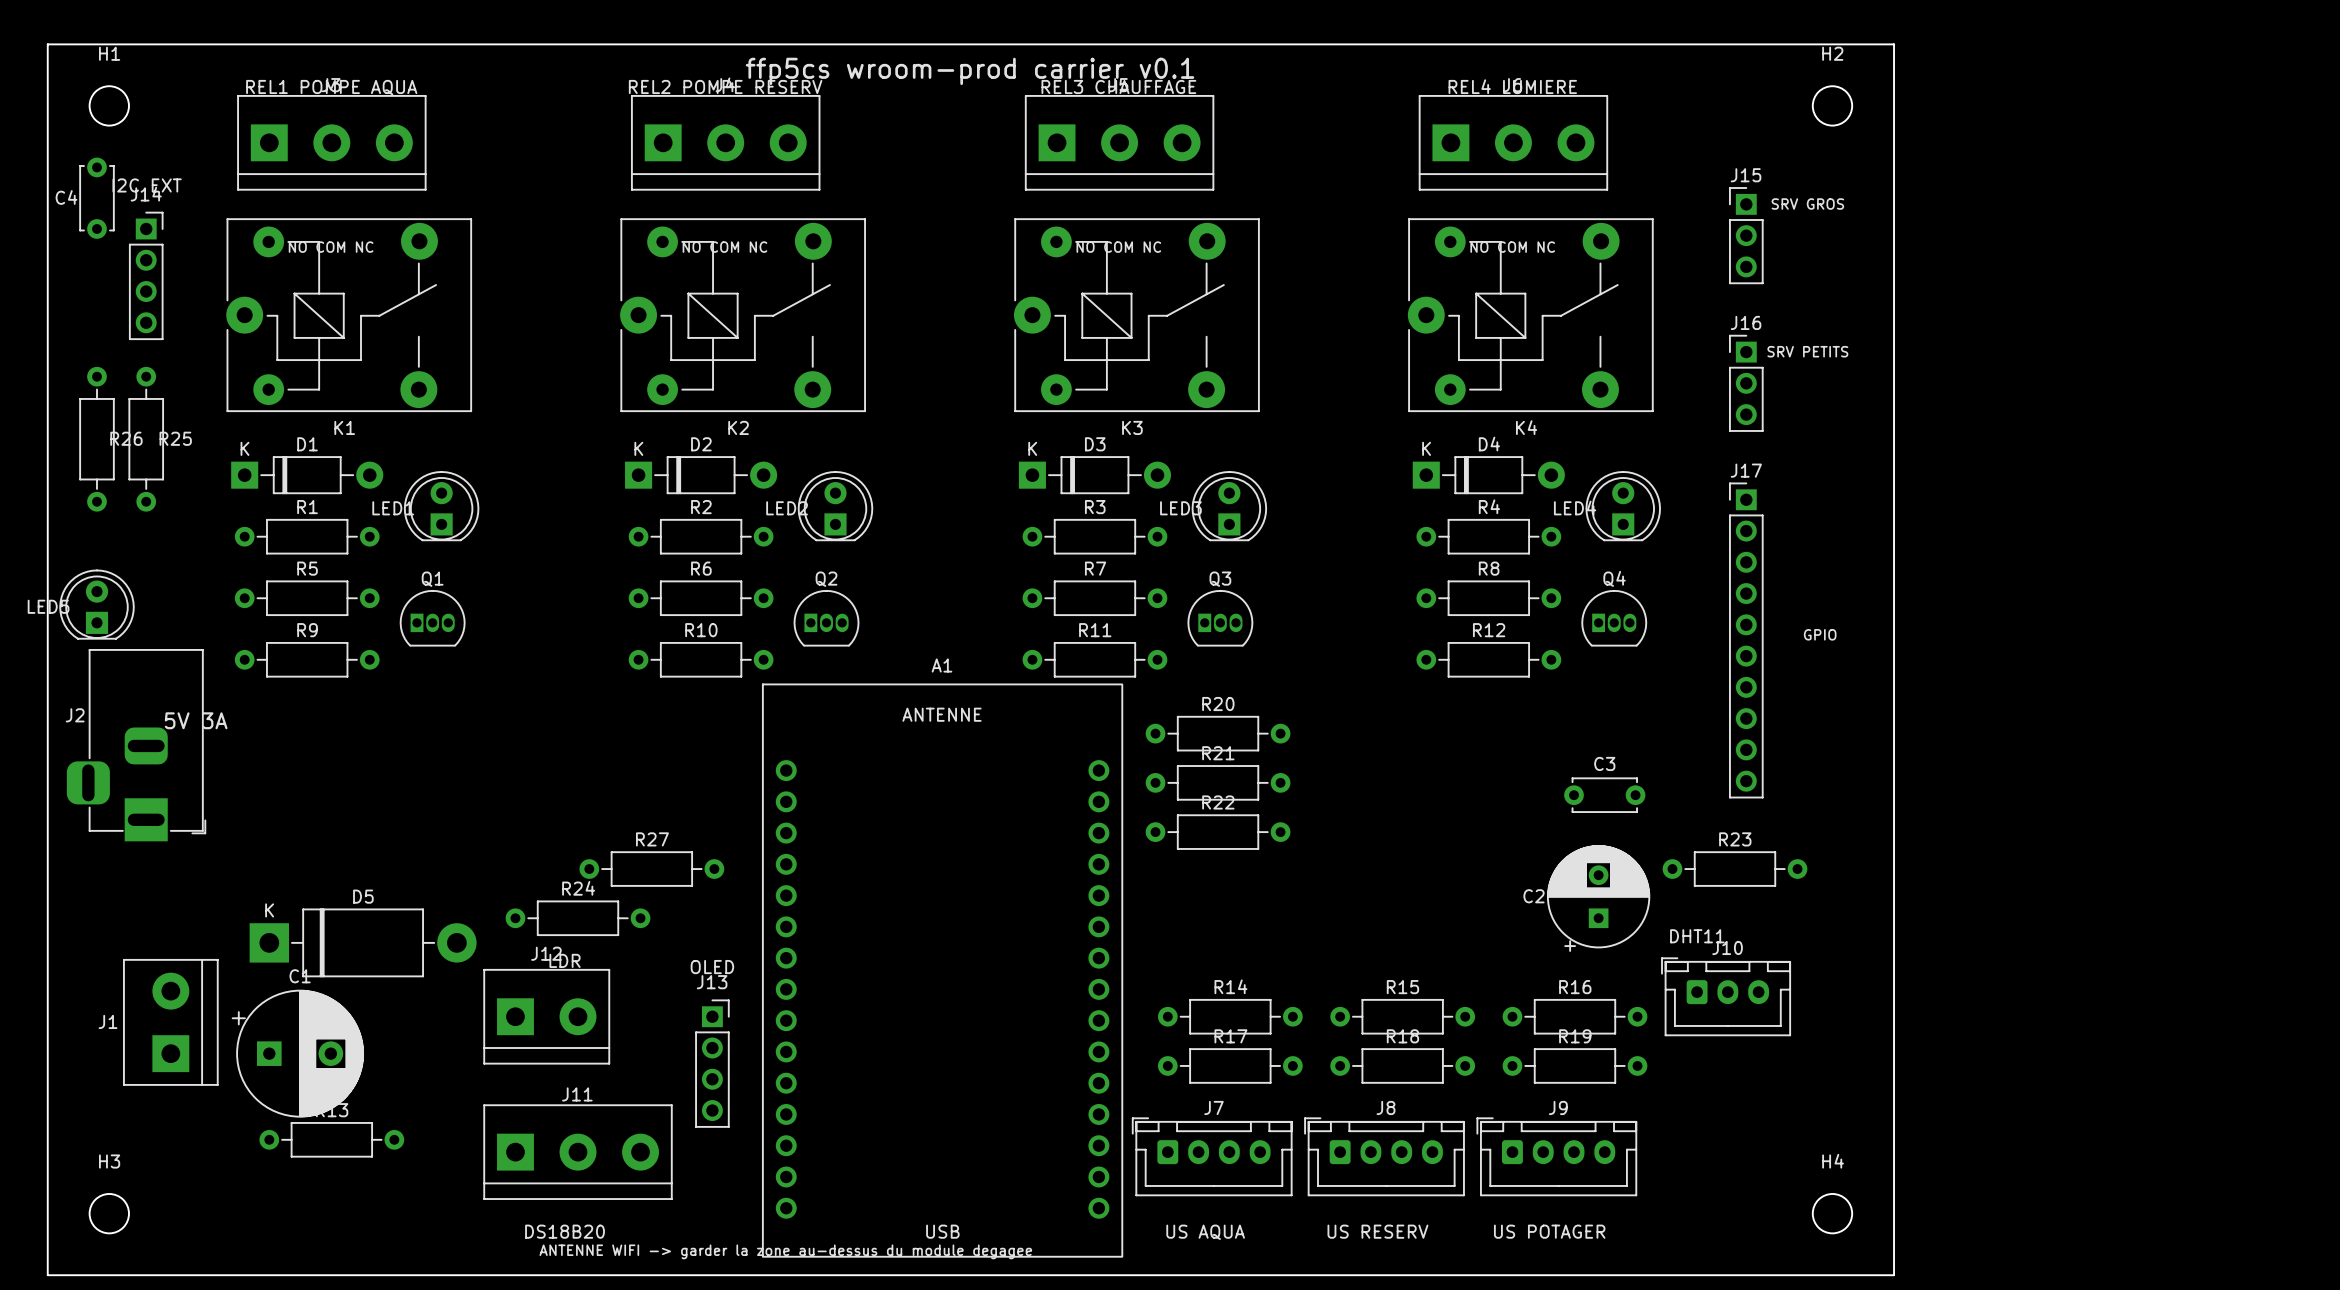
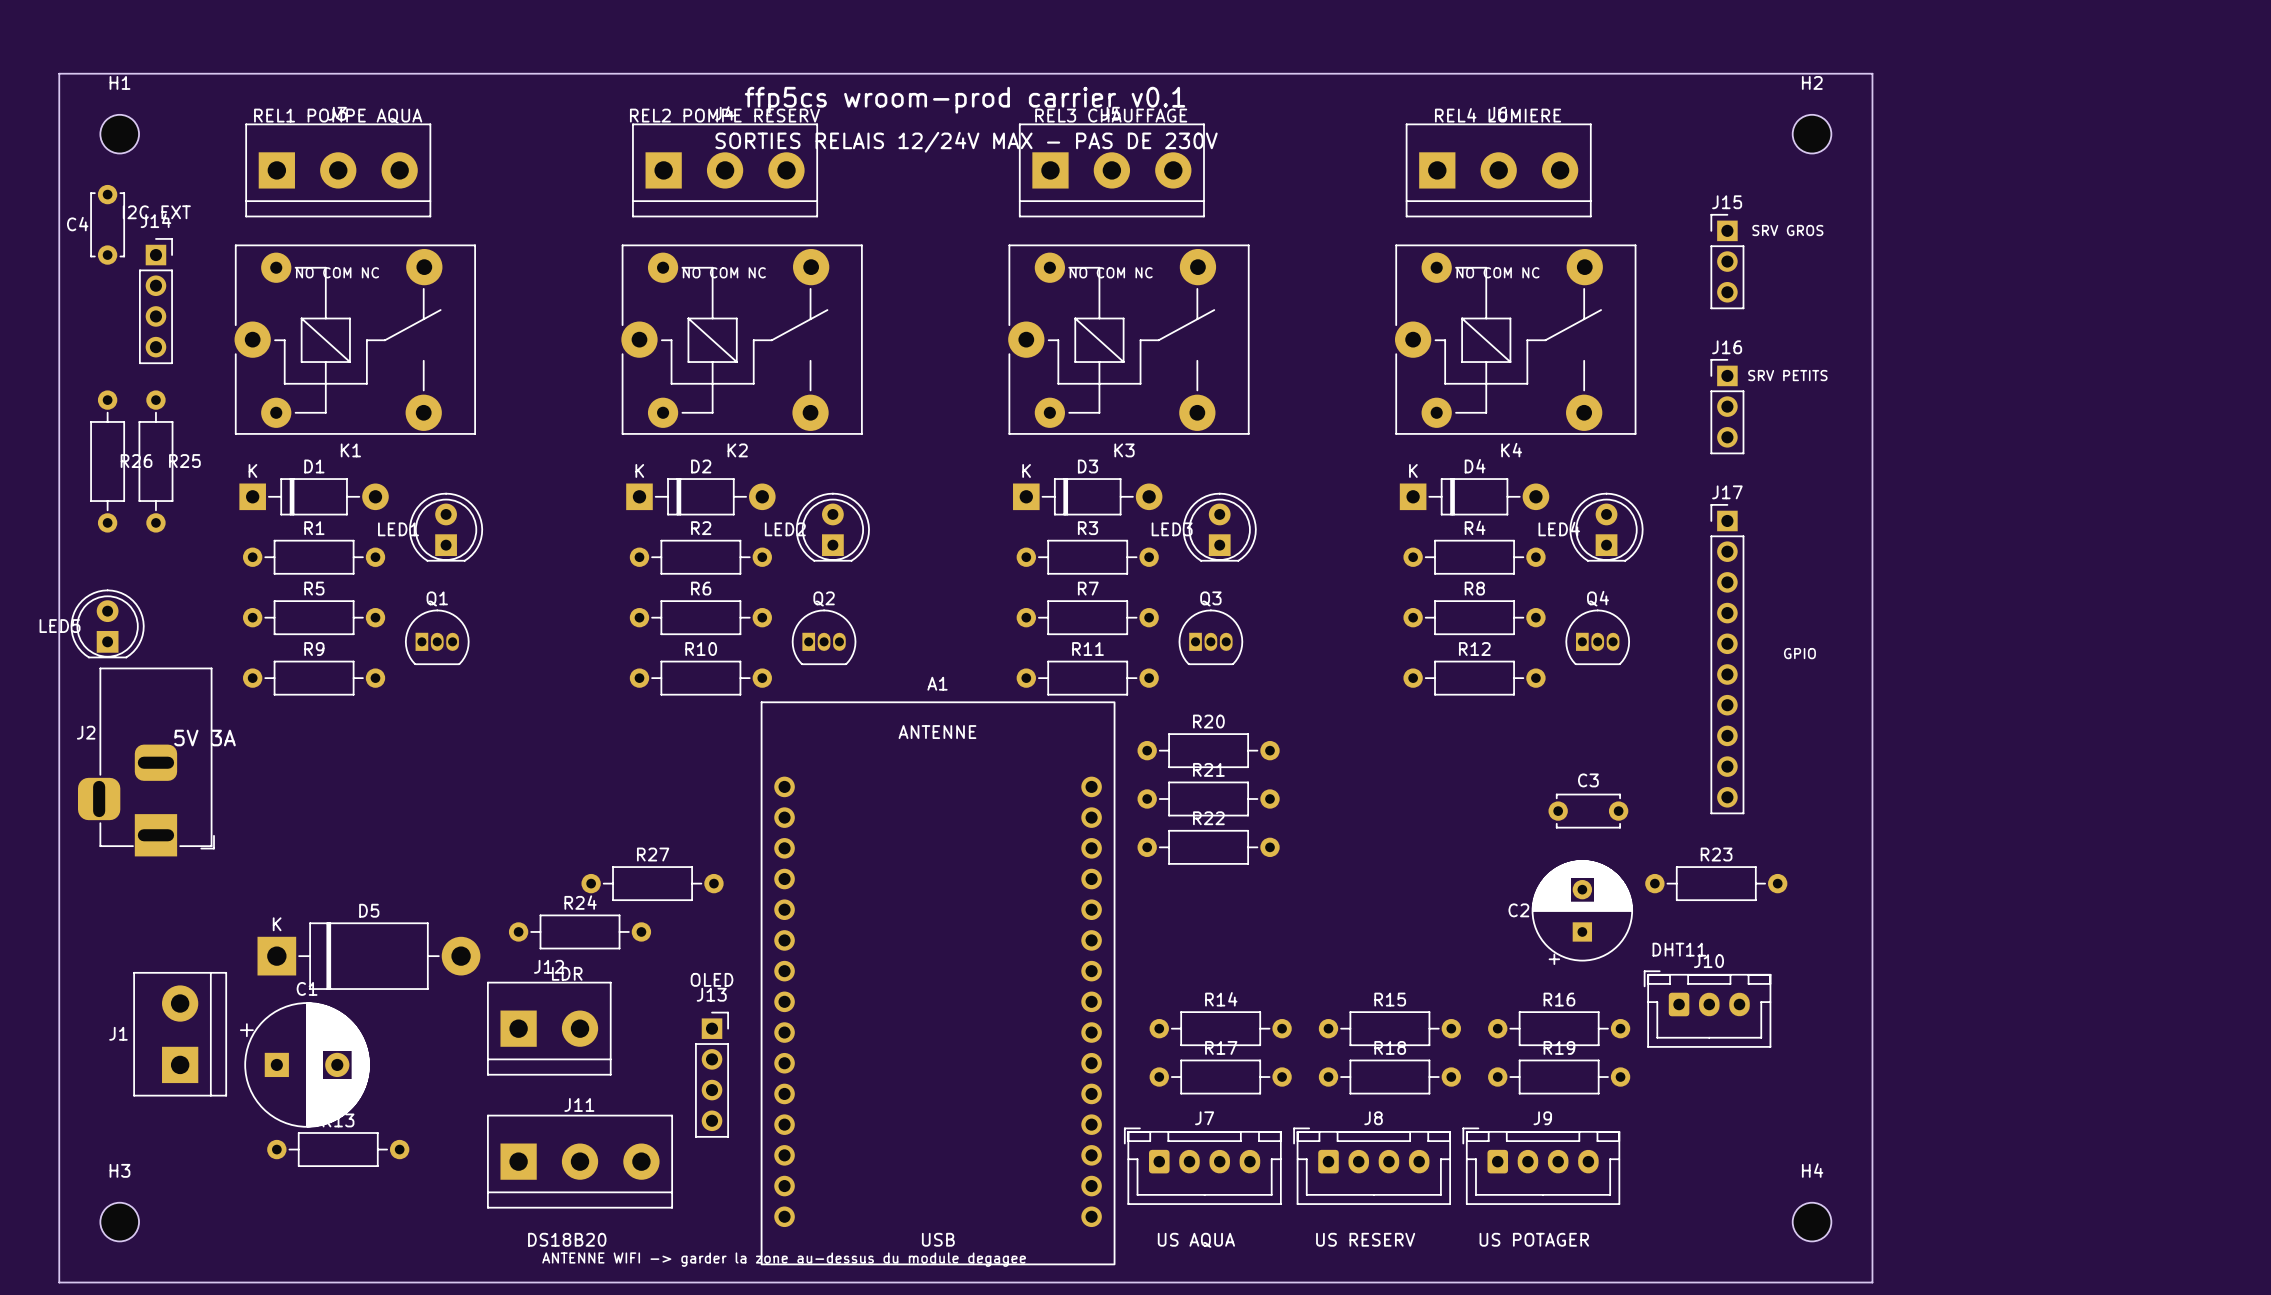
text: none -> SORTIES RELAIS 12/24V MAX - PAS DE 230V (966, 142)

